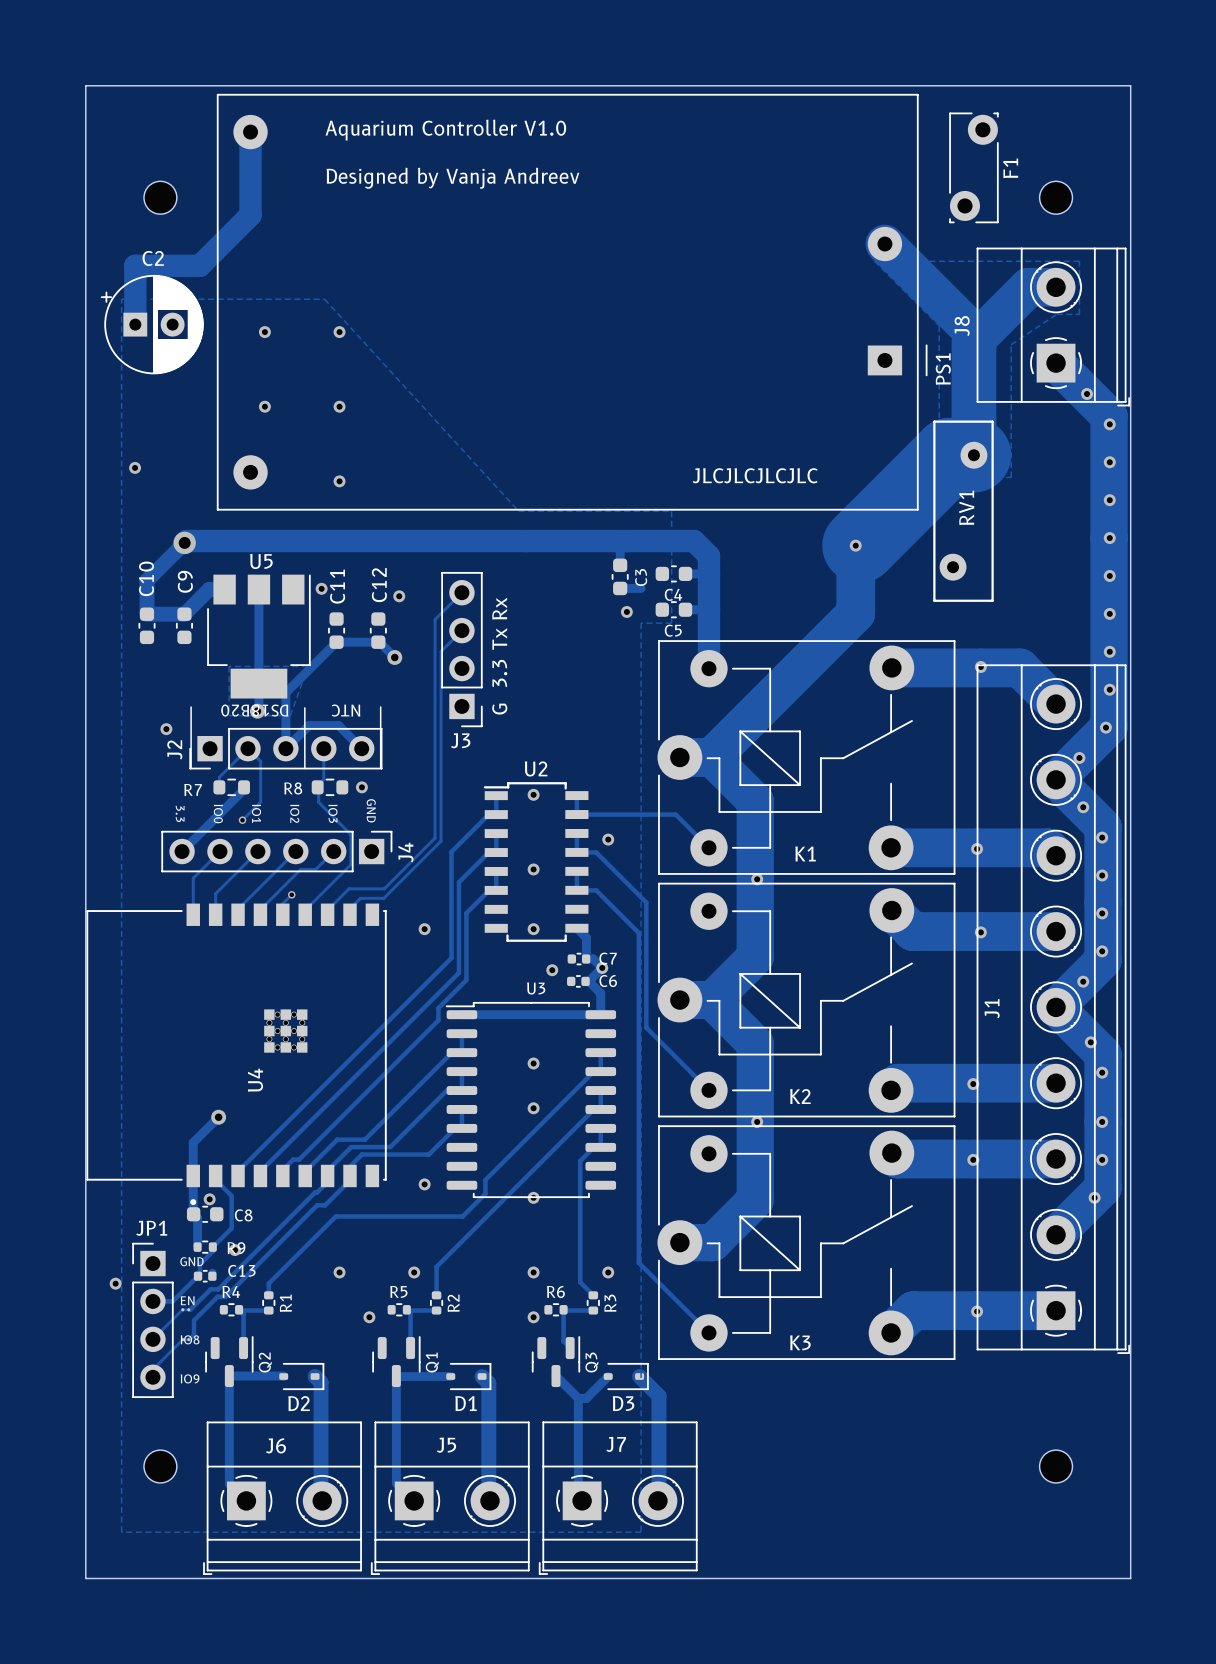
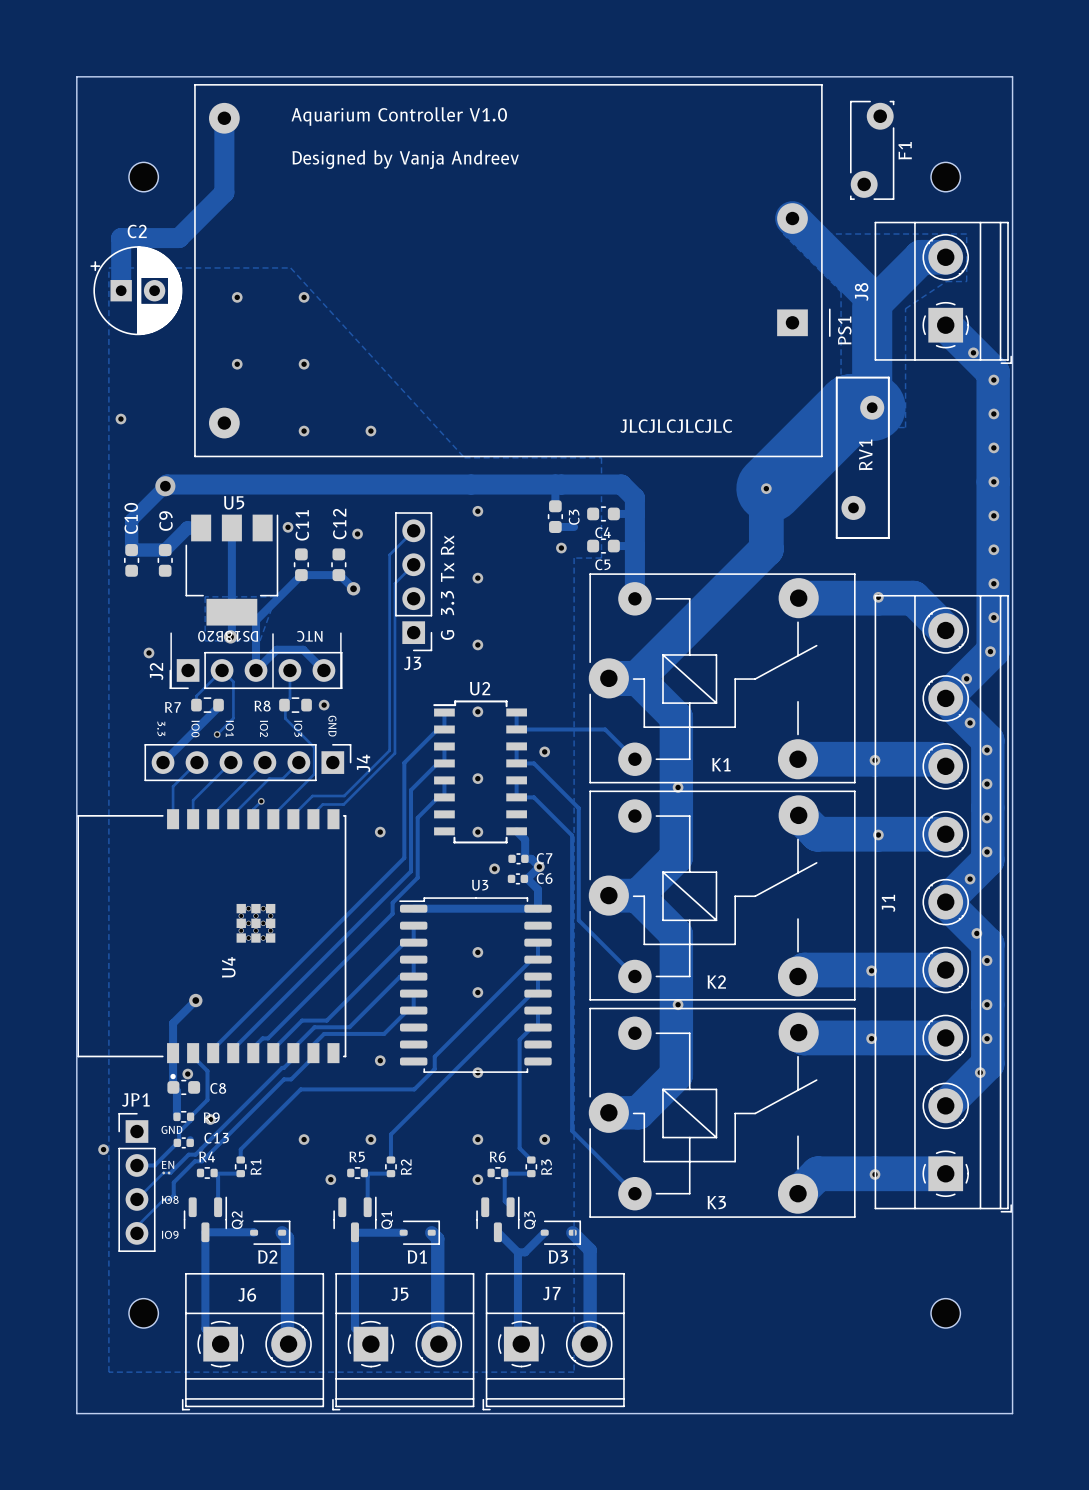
via: none -> (370, 431)
via: none -> (477, 511)
via: none -> (477, 578)
via: none -> (477, 644)

